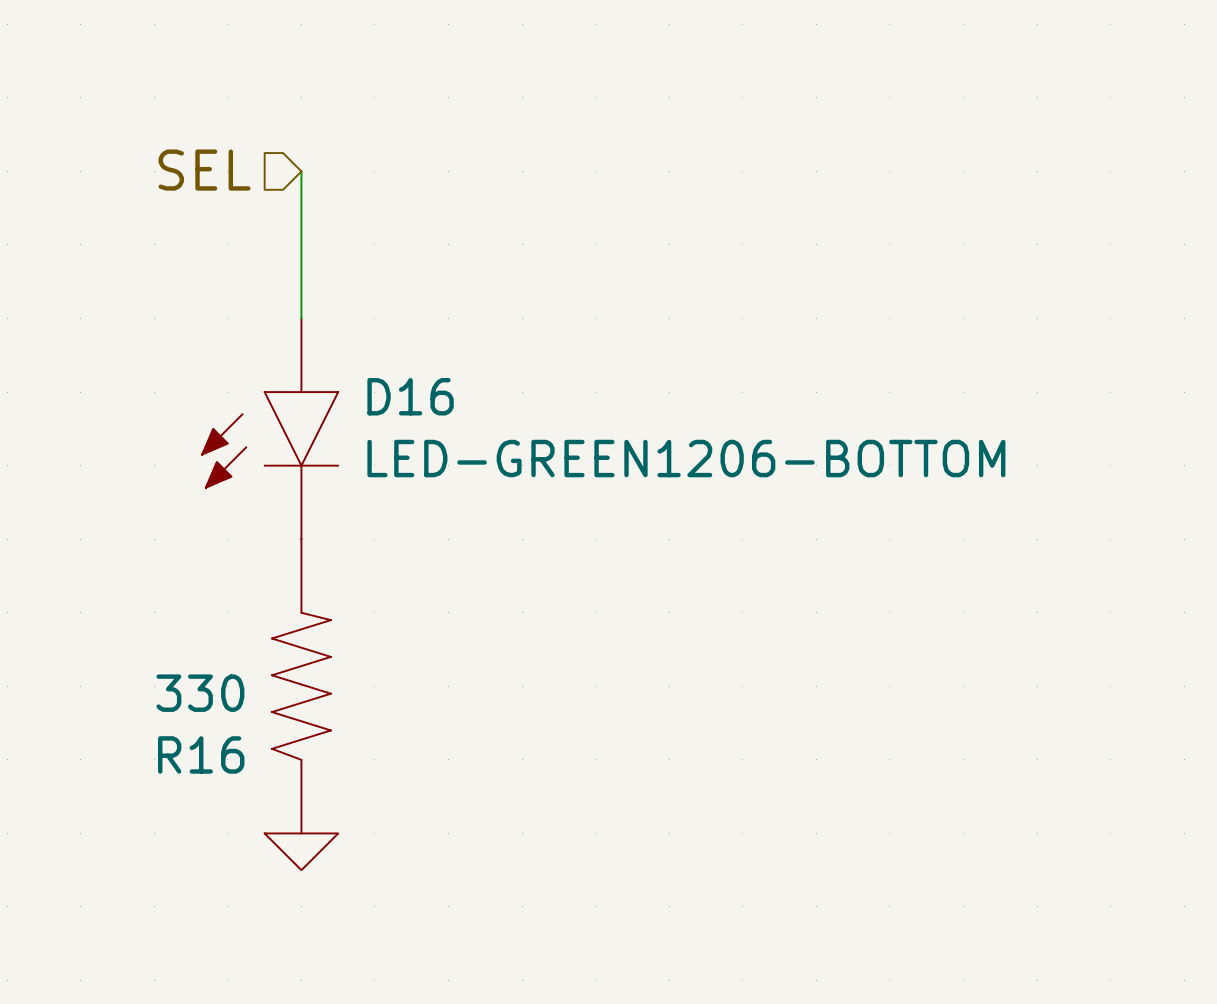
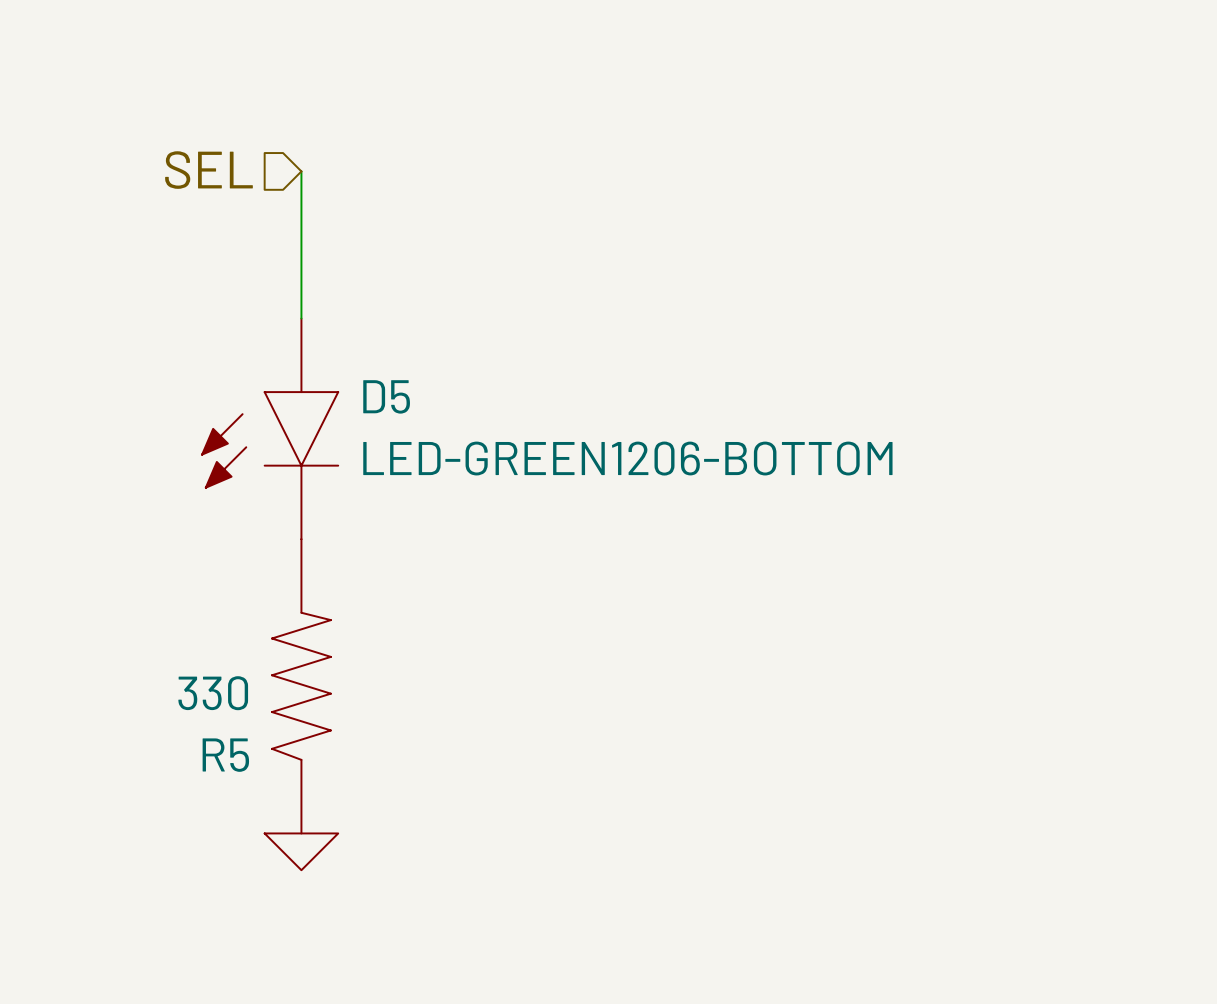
D16 name: D16 (410, 396) -> D5 (386, 396)
R16 name: R16 (201, 754) -> R5 (225, 755)

